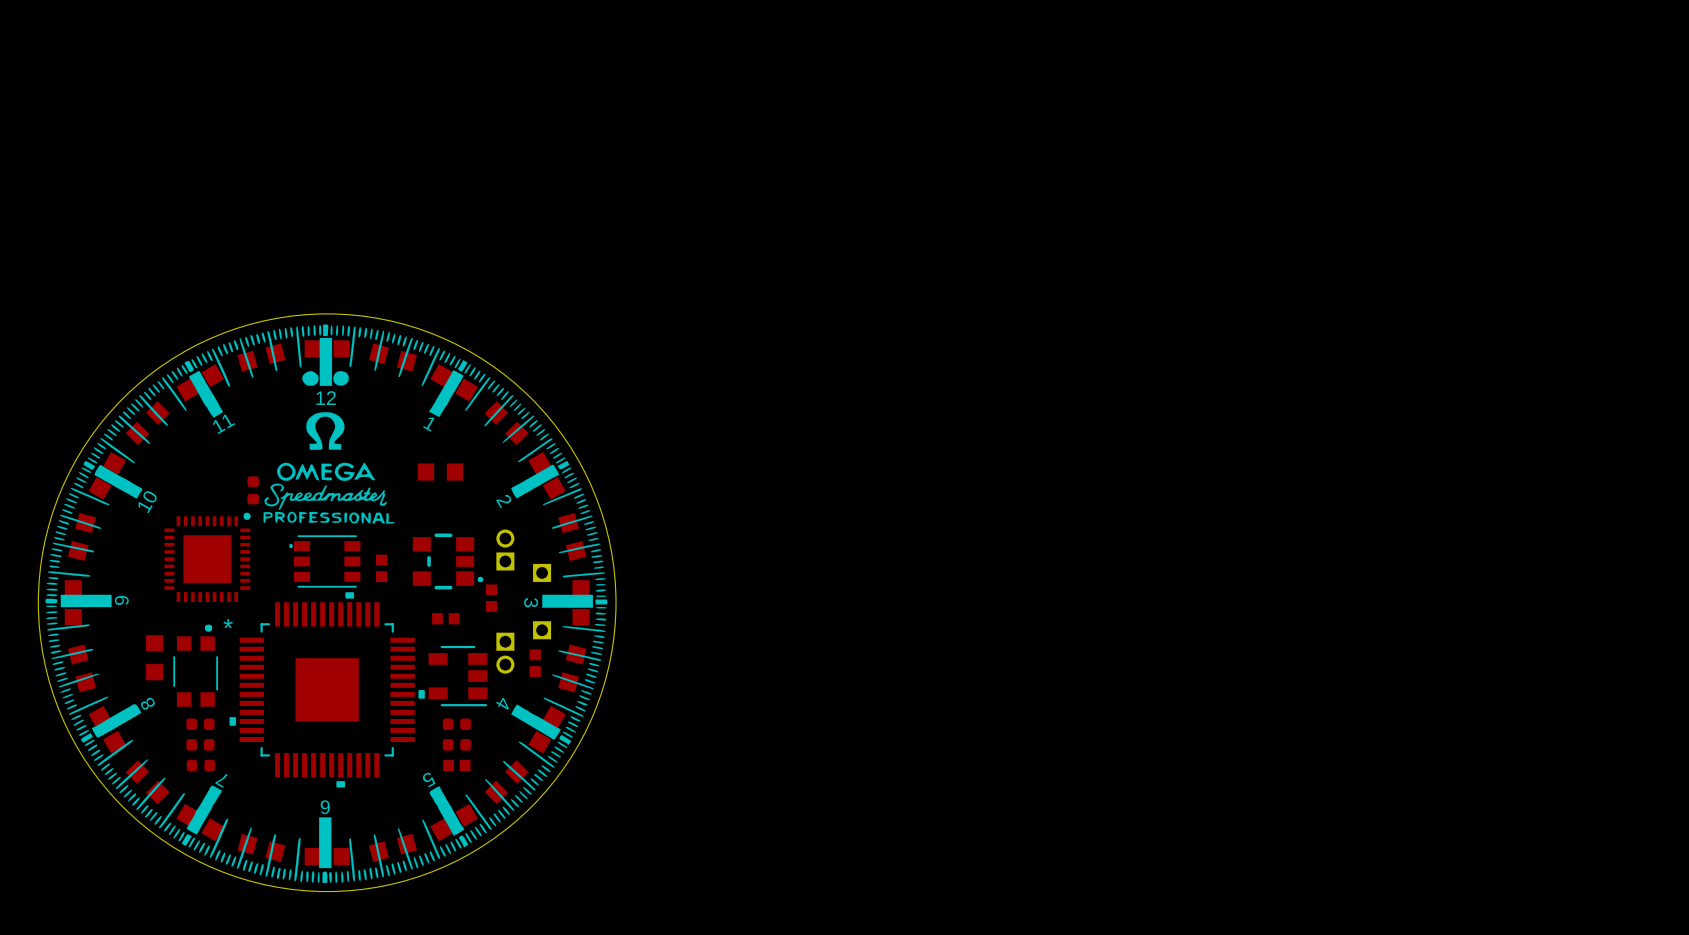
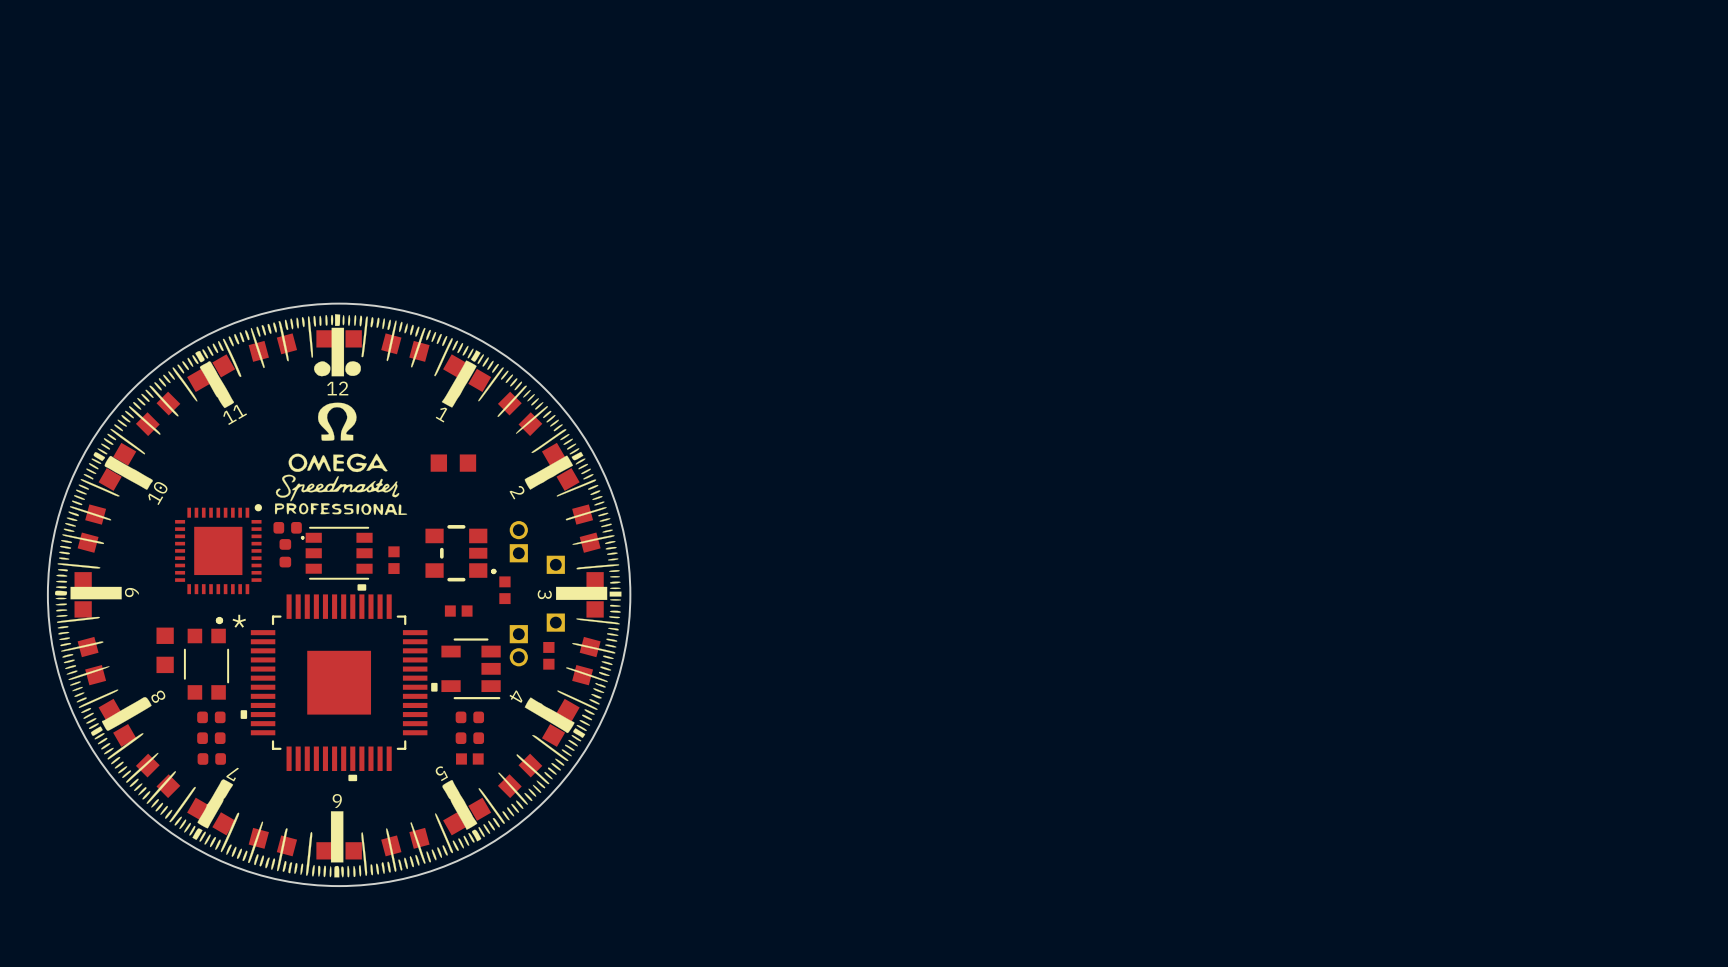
part: (253, 490) -> none
part: none -> (287, 527)
part: none -> (285, 553)

